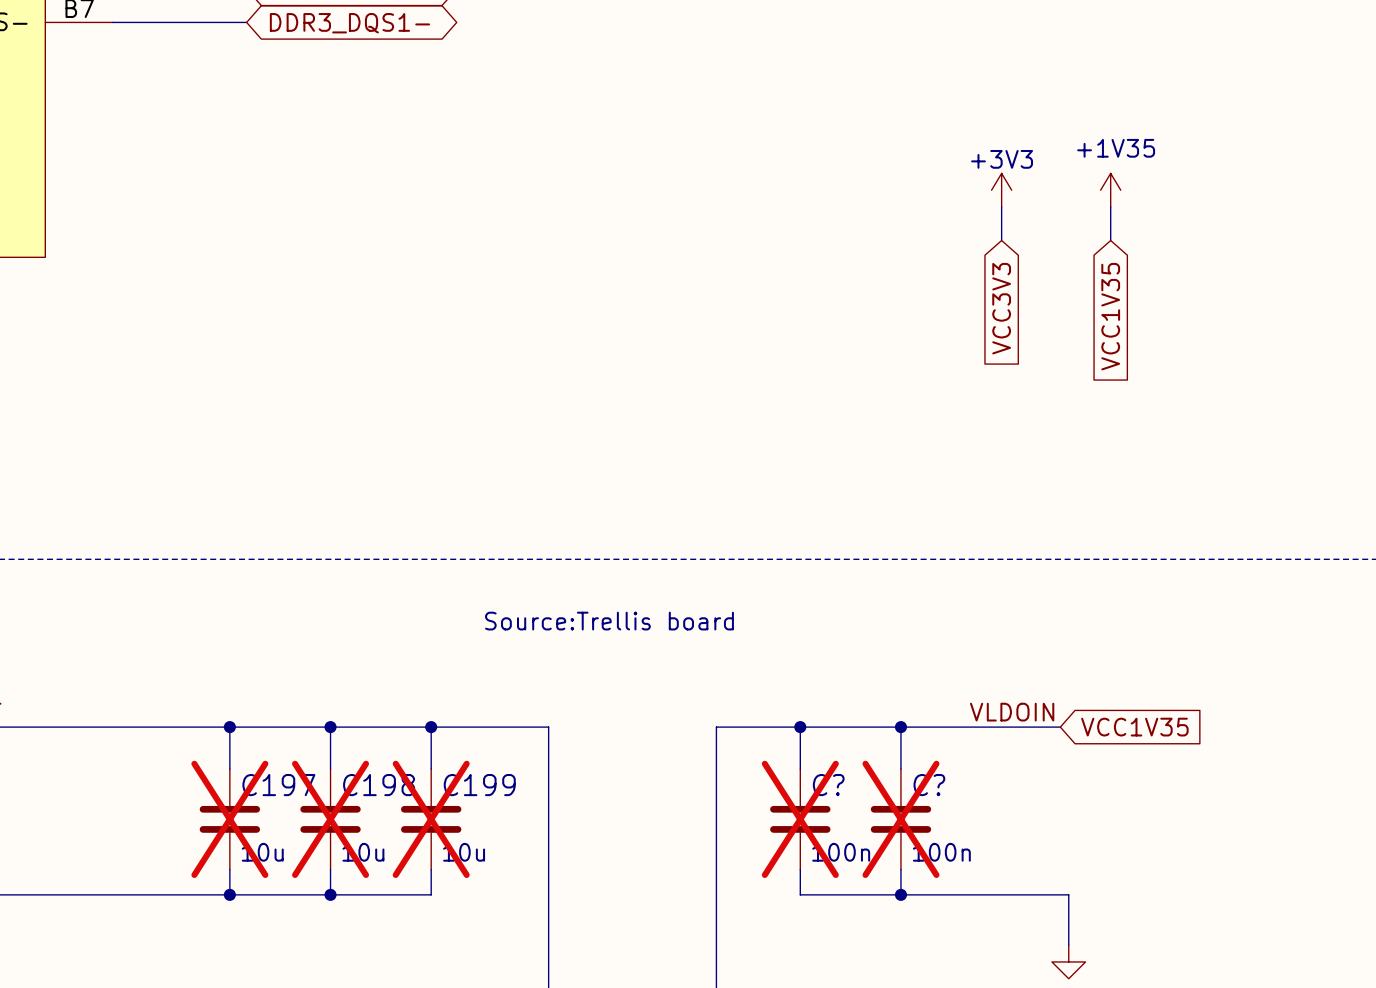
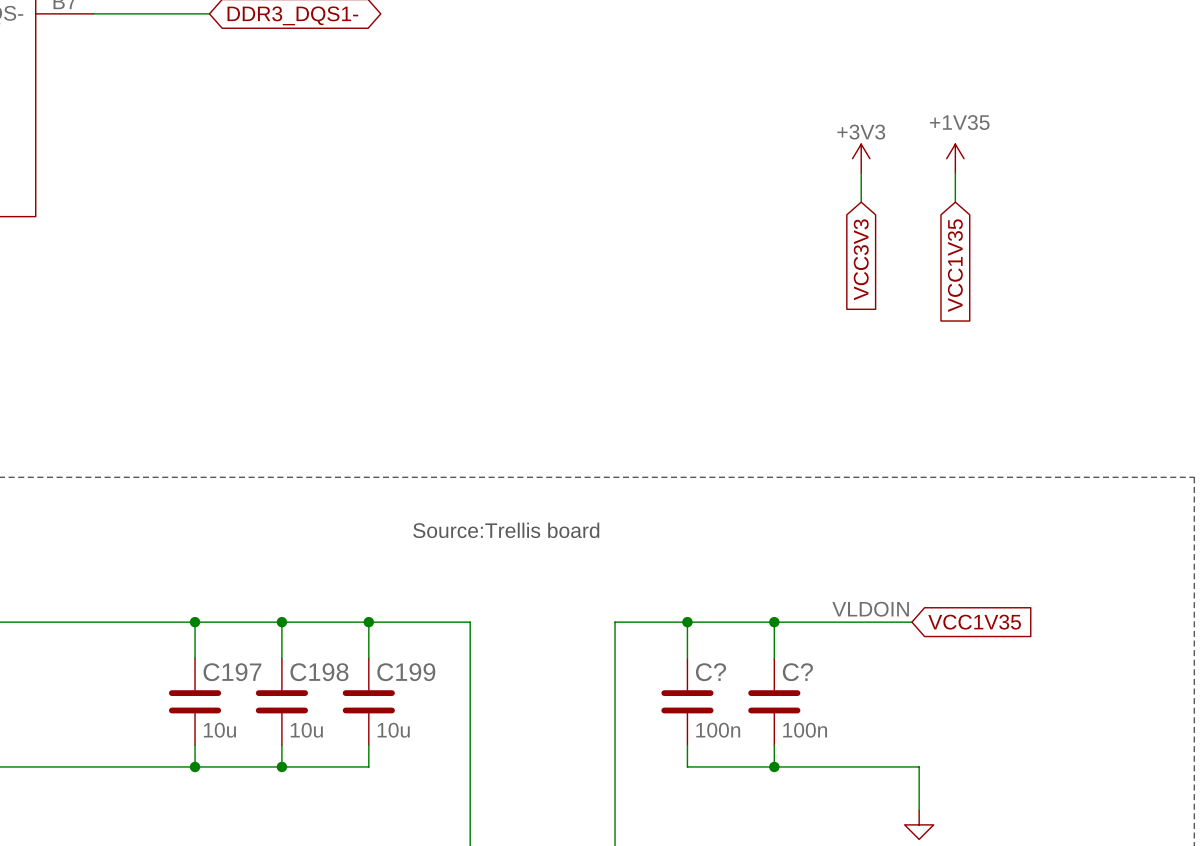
C197 do-not-place cross: (229, 819) -> none
C198 do-not-place cross: (330, 819) -> none
C199 do-not-place cross: (431, 819) -> none
C? do-not-place cross: (800, 819) -> none
C? do-not-place cross: (900, 819) -> none

